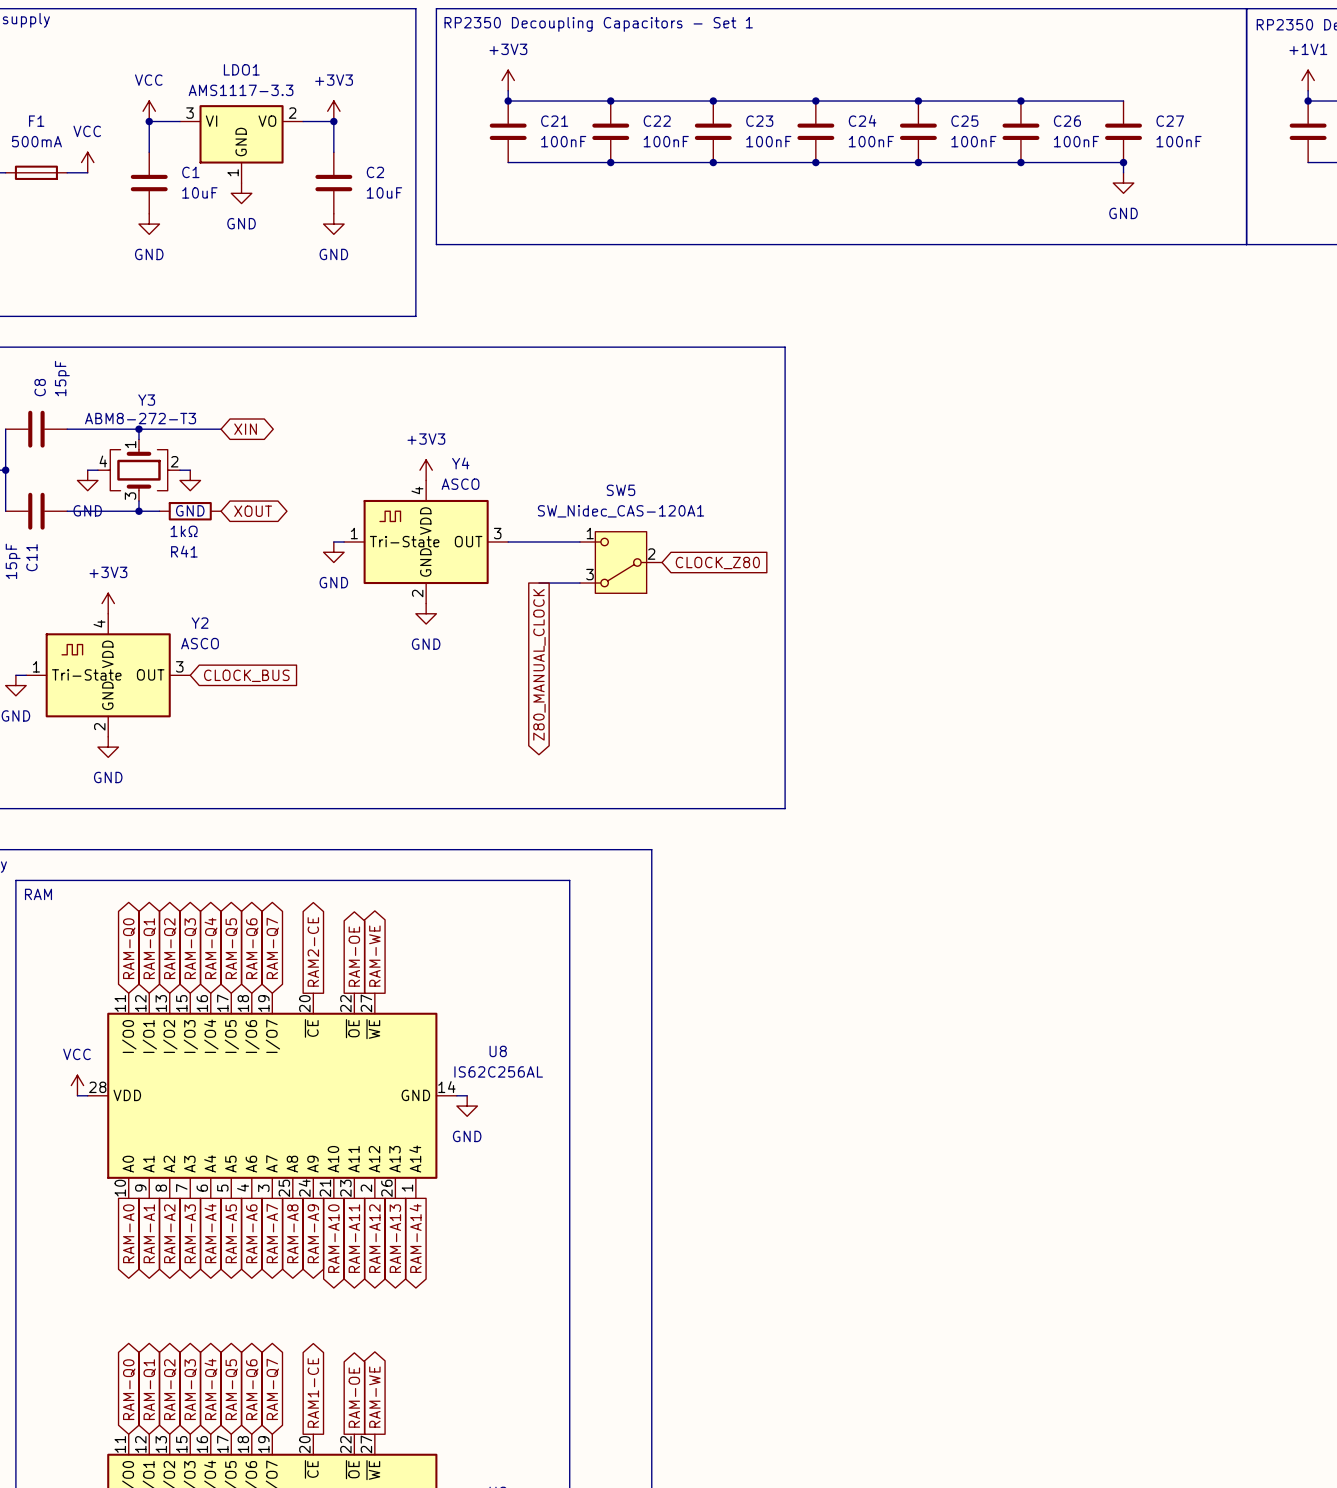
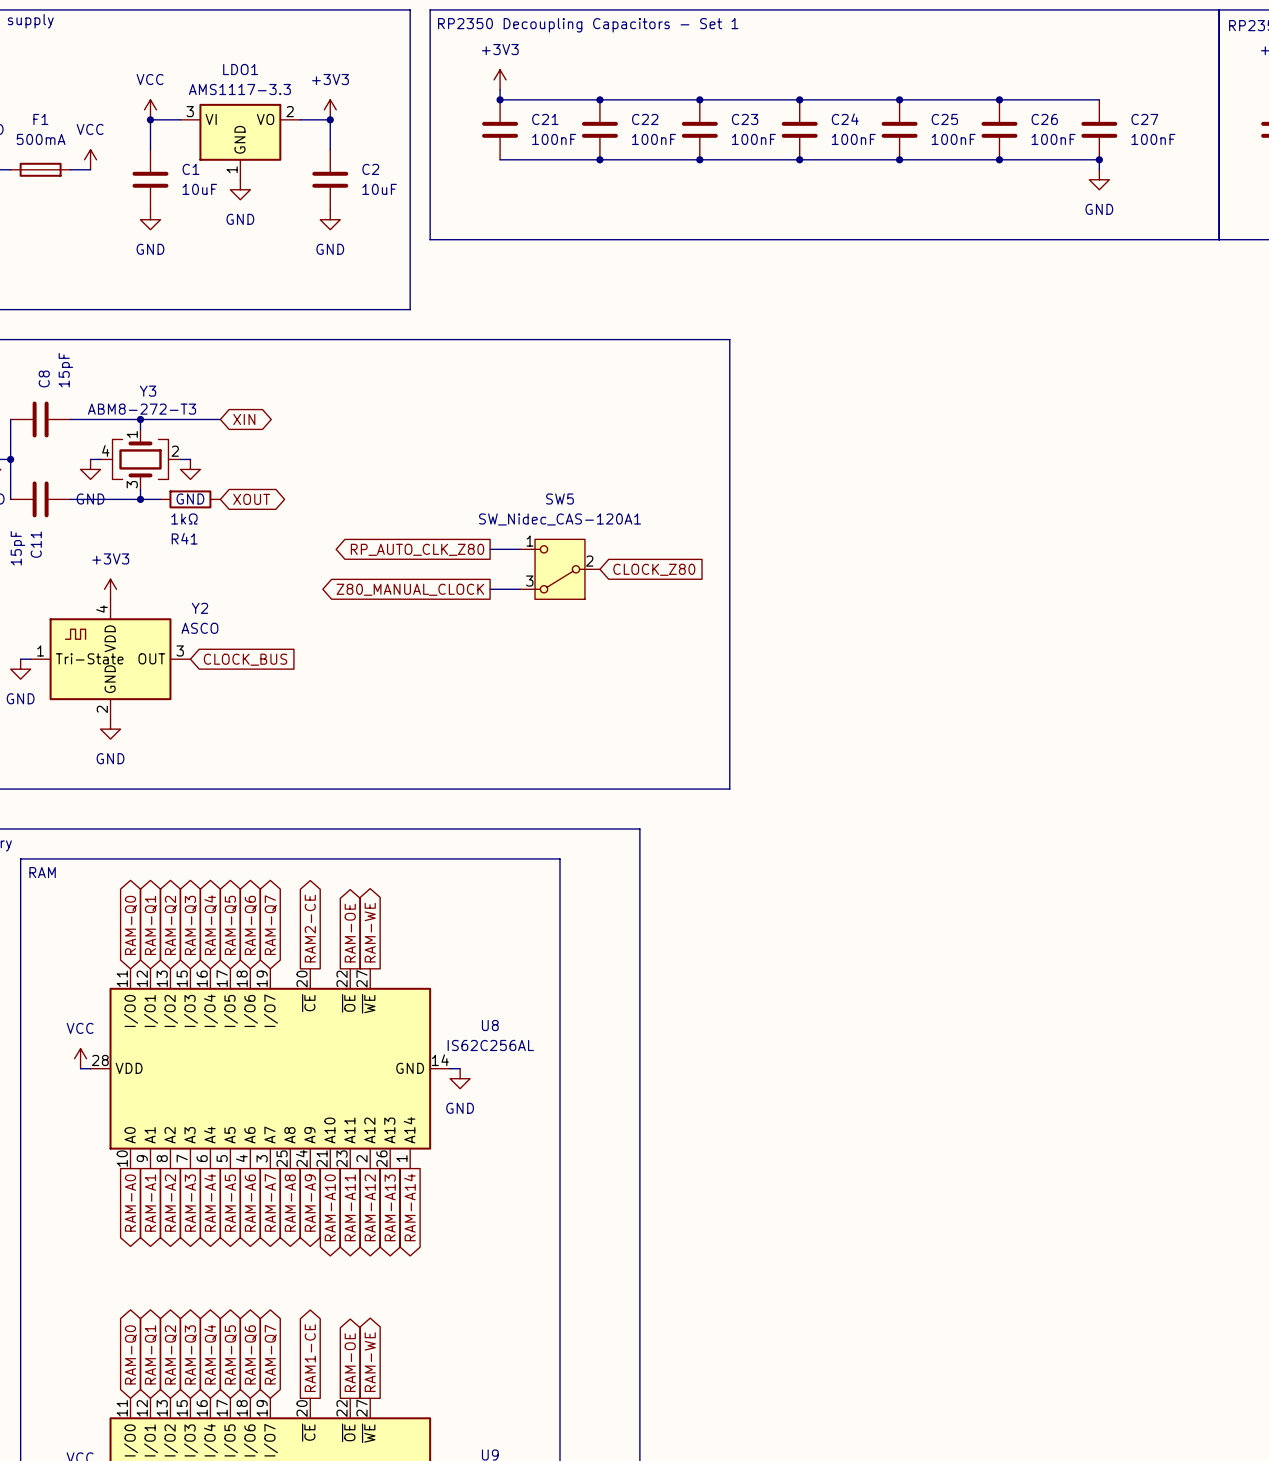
line: (744, 347) (785, 347) (785, 808) (744, 808) -> (729, 339) (729, 789)
power symbol: +3V3 (426, 470) -> none
wire: (333, 541) (344, 541) -> none
Y4: ASCO (426, 541) -> none
wire: (508, 541) (579, 541) -> none
power symbol: GND (333, 552) -> none
global label: none -> RP_AUTO_CLK_Z80 (417, 549)
wire: none -> (490, 549) (520, 549)
SW5 position: (620, 562) -> (559, 569)
global label position: CLOCK_Z80 (717, 562) -> CLOCK_Z80 (654, 569)
wire: none -> (490, 589) (520, 589)
power symbol: GND (426, 613) -> none
global label rotation: 0° (539, 664) -> 90° clockwise (410, 589)

